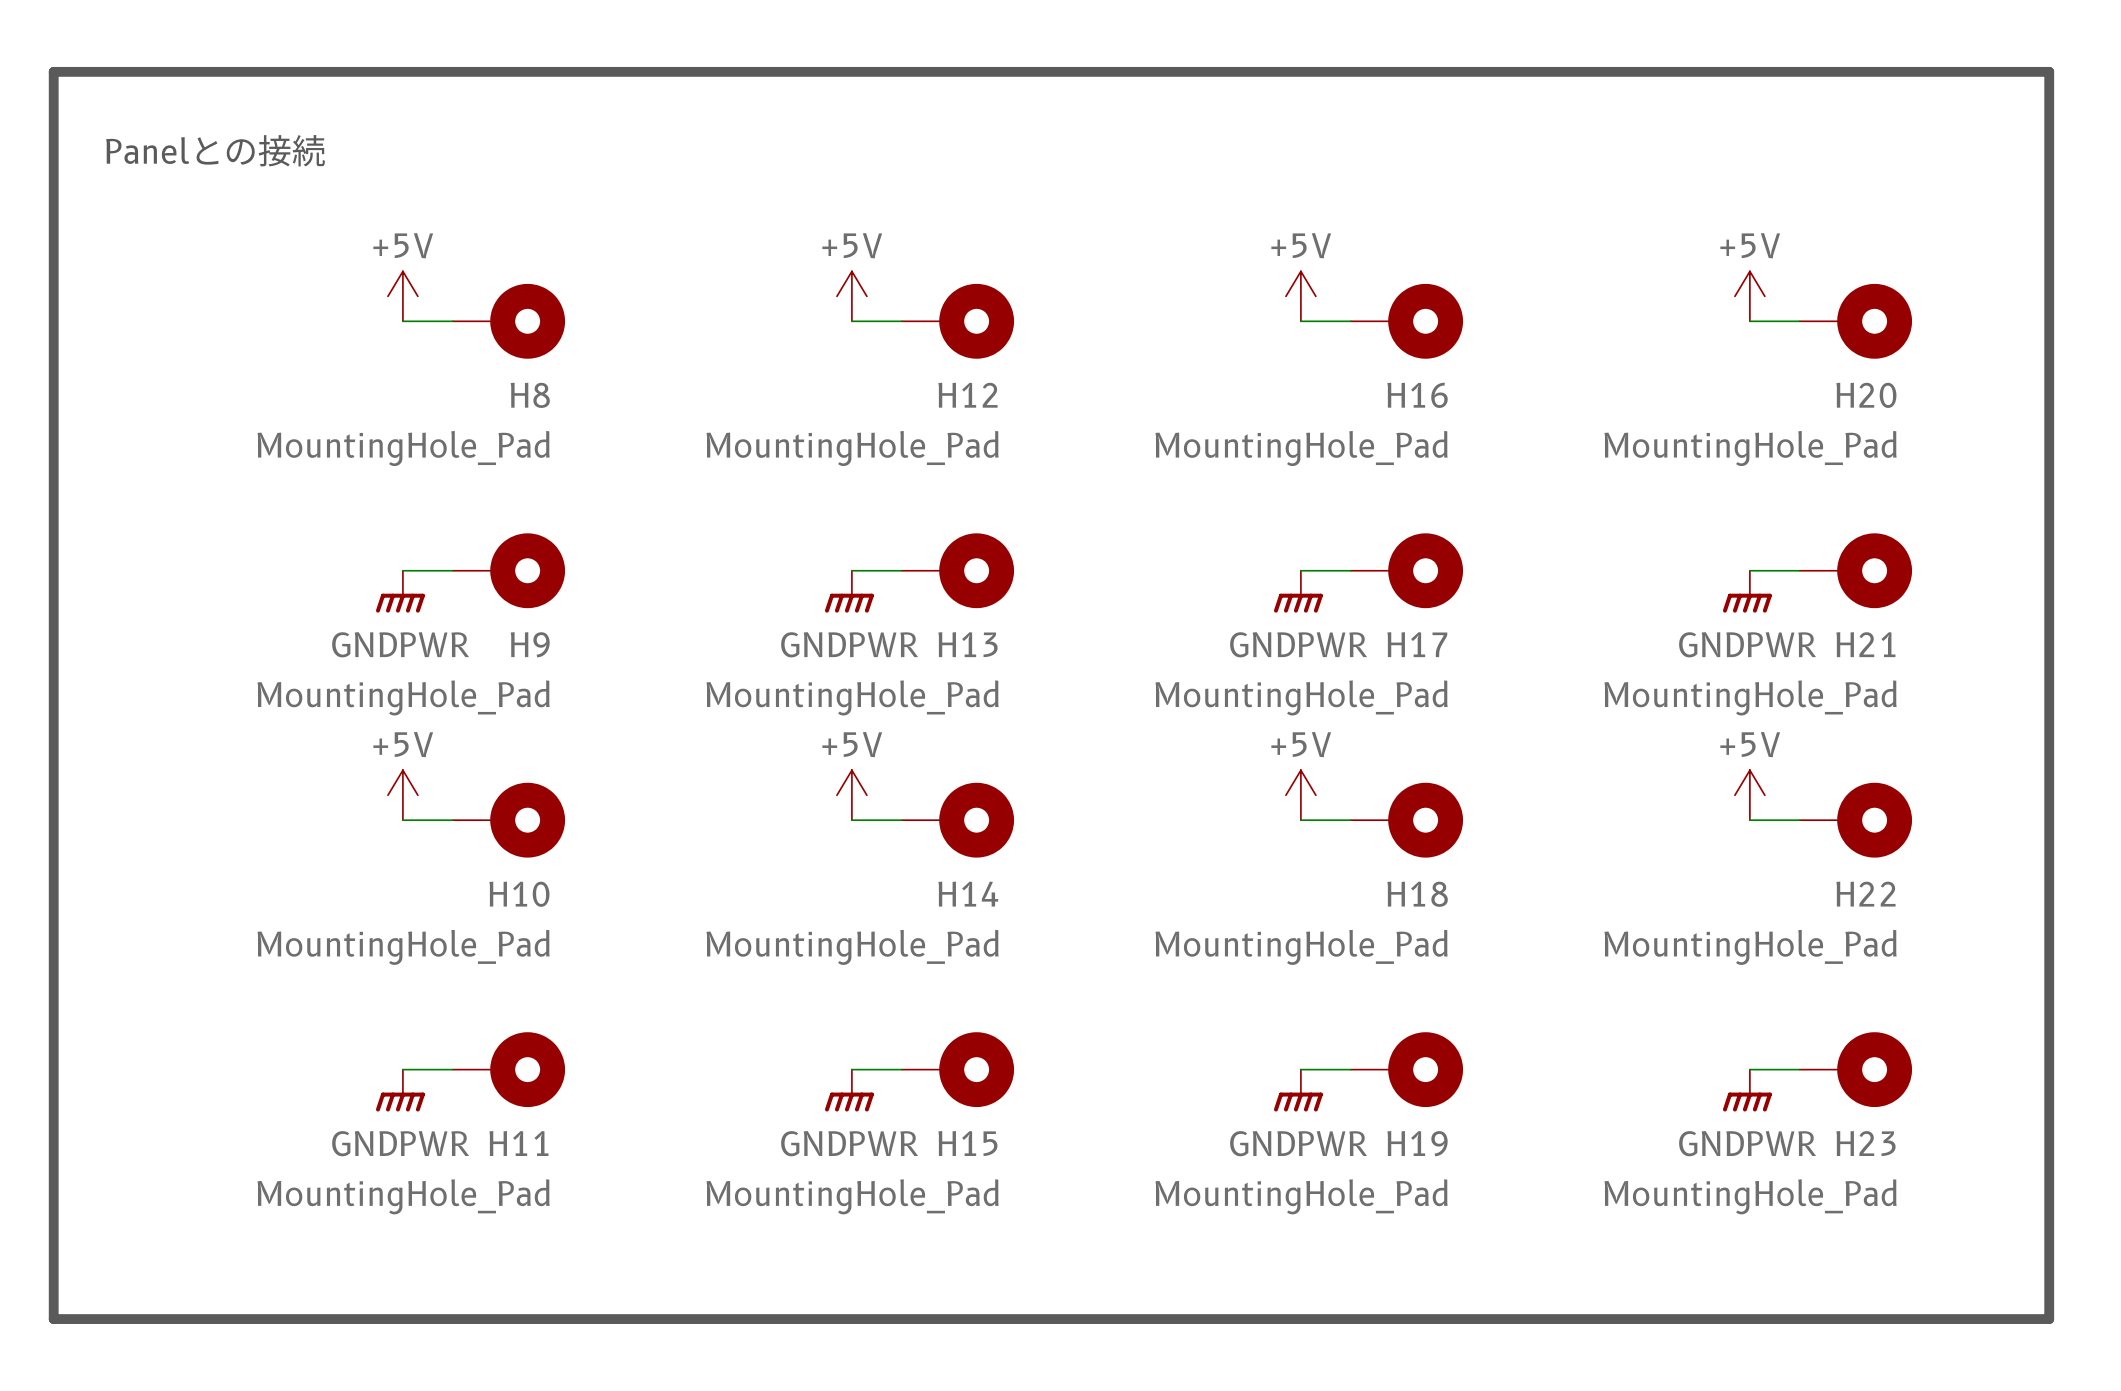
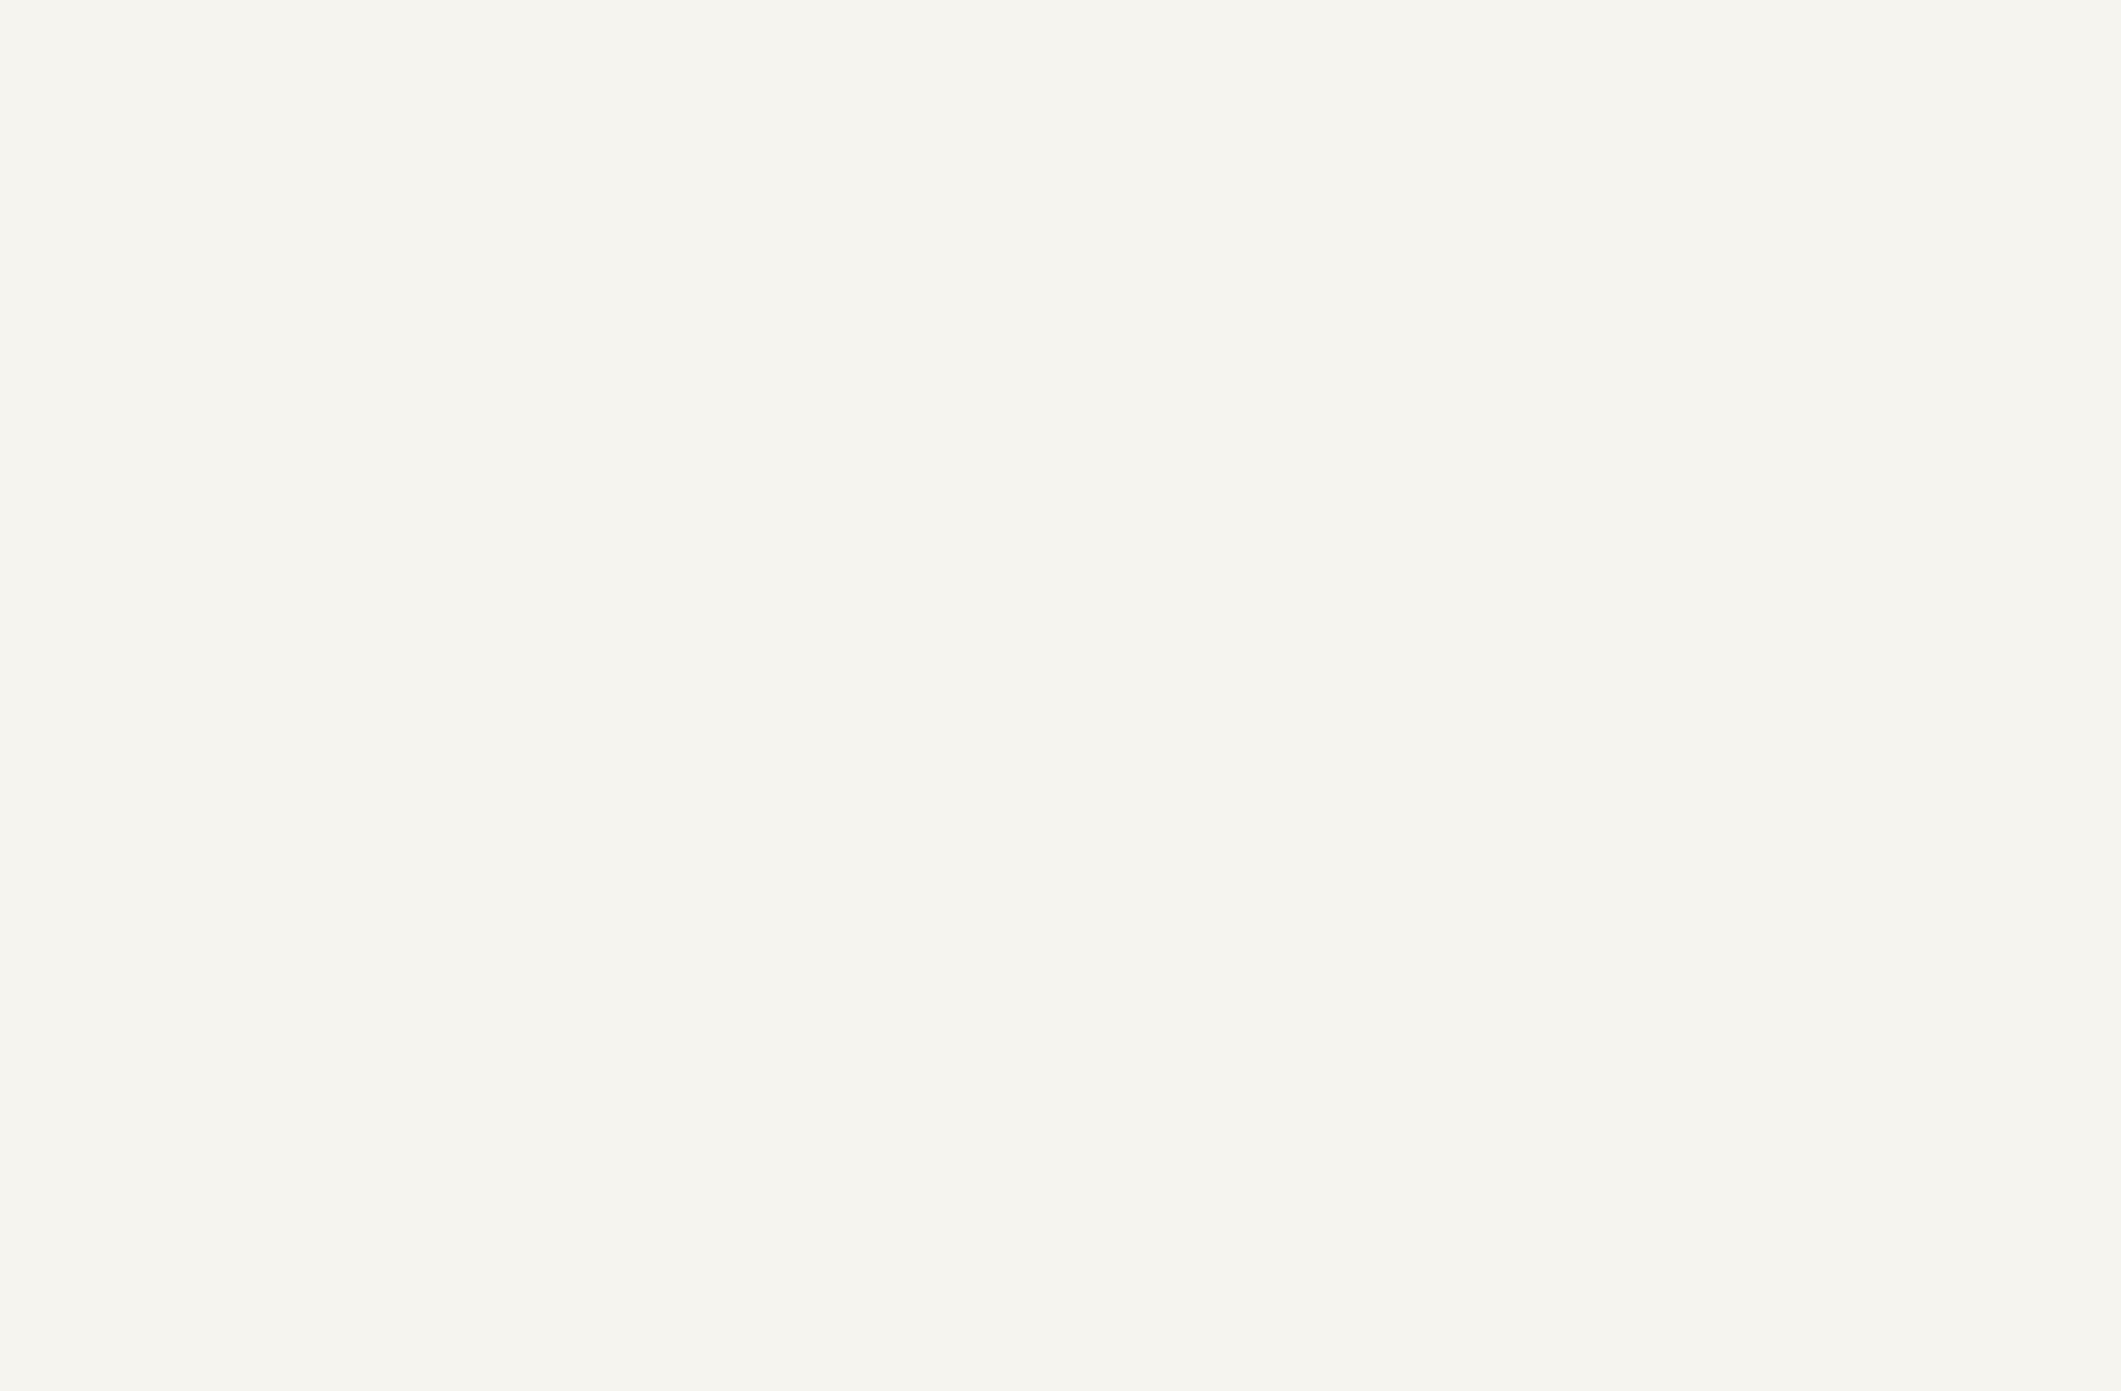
line: (53, 71) (53, 1319) (2049, 1319) (2049, 71) (53, 71) -> none
text: Panelとの接続 (215, 150) -> none
power symbol: +5V (402, 296) -> none
power symbol: +5V (851, 296) -> none
power symbol: +5V (1300, 296) -> none
power symbol: +5V (1749, 296) -> none
wire: (402, 321) (452, 321) -> none
H8: MountingHole_Pad (508, 321) -> none
wire: (851, 321) (901, 321) -> none
H12: MountingHole_Pad (957, 321) -> none
wire: (1300, 321) (1350, 321) -> none
H16: MountingHole_Pad (1406, 321) -> none
wire: (1749, 321) (1799, 321) -> none
H20: MountingHole_Pad (1855, 321) -> none
wire: (402, 570) (452, 570) -> none
H9: MountingHole_Pad (508, 570) -> none
wire: (851, 570) (901, 570) -> none
H13: MountingHole_Pad (957, 570) -> none
wire: (1300, 570) (1350, 570) -> none
H17: MountingHole_Pad (1406, 570) -> none
wire: (1749, 570) (1799, 570) -> none
H21: MountingHole_Pad (1855, 570) -> none
power symbol: GNDPWR (400, 591) -> none
power symbol: GNDPWR (849, 591) -> none
power symbol: GNDPWR (1298, 591) -> none
power symbol: GNDPWR (1747, 591) -> none
power symbol: +5V (402, 795) -> none
power symbol: +5V (851, 795) -> none
power symbol: +5V (1300, 795) -> none
power symbol: +5V (1749, 795) -> none
wire: (402, 820) (452, 820) -> none
H10: MountingHole_Pad (508, 820) -> none
wire: (851, 820) (901, 820) -> none
H14: MountingHole_Pad (957, 820) -> none
wire: (1300, 820) (1350, 820) -> none
H18: MountingHole_Pad (1406, 820) -> none
wire: (1749, 820) (1799, 820) -> none
H22: MountingHole_Pad (1855, 820) -> none
wire: (402, 1069) (452, 1069) -> none
H11: MountingHole_Pad (508, 1069) -> none
wire: (851, 1069) (901, 1069) -> none
H15: MountingHole_Pad (957, 1069) -> none
wire: (1300, 1069) (1350, 1069) -> none
H19: MountingHole_Pad (1406, 1069) -> none
wire: (1749, 1069) (1799, 1069) -> none
H23: MountingHole_Pad (1855, 1069) -> none
power symbol: GNDPWR (400, 1090) -> none
power symbol: GNDPWR (849, 1090) -> none
power symbol: GNDPWR (1298, 1090) -> none
power symbol: GNDPWR (1747, 1090) -> none

